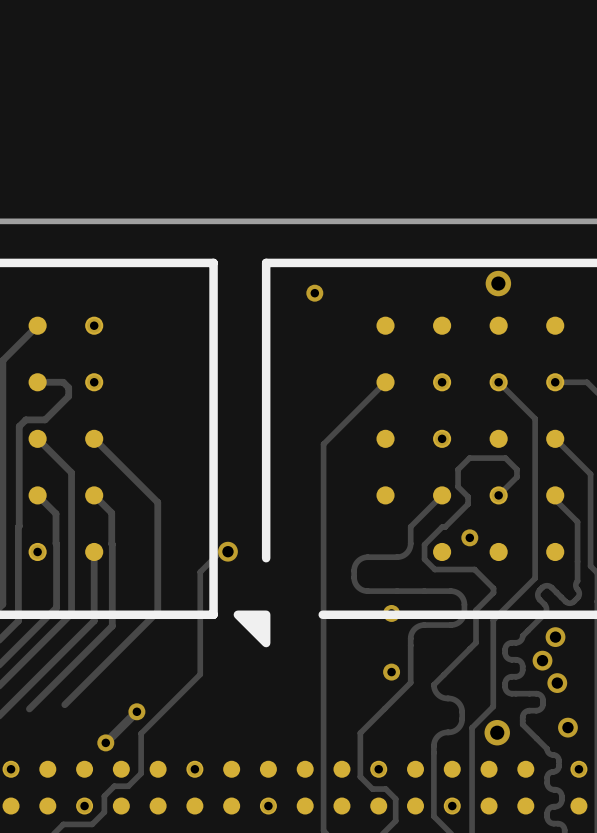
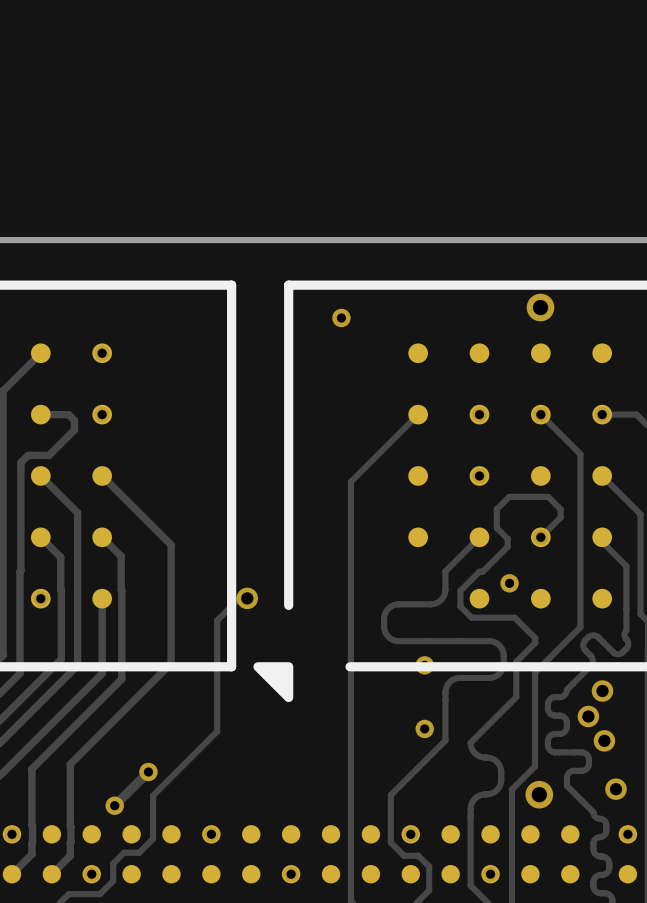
track: none -> (70, 764) (70, 855) (51, 874)
track: none -> (31, 768) (31, 825)
track: none -> (32, 825) (32, 842)
track: none -> (31, 843) (31, 854) (11, 874)

